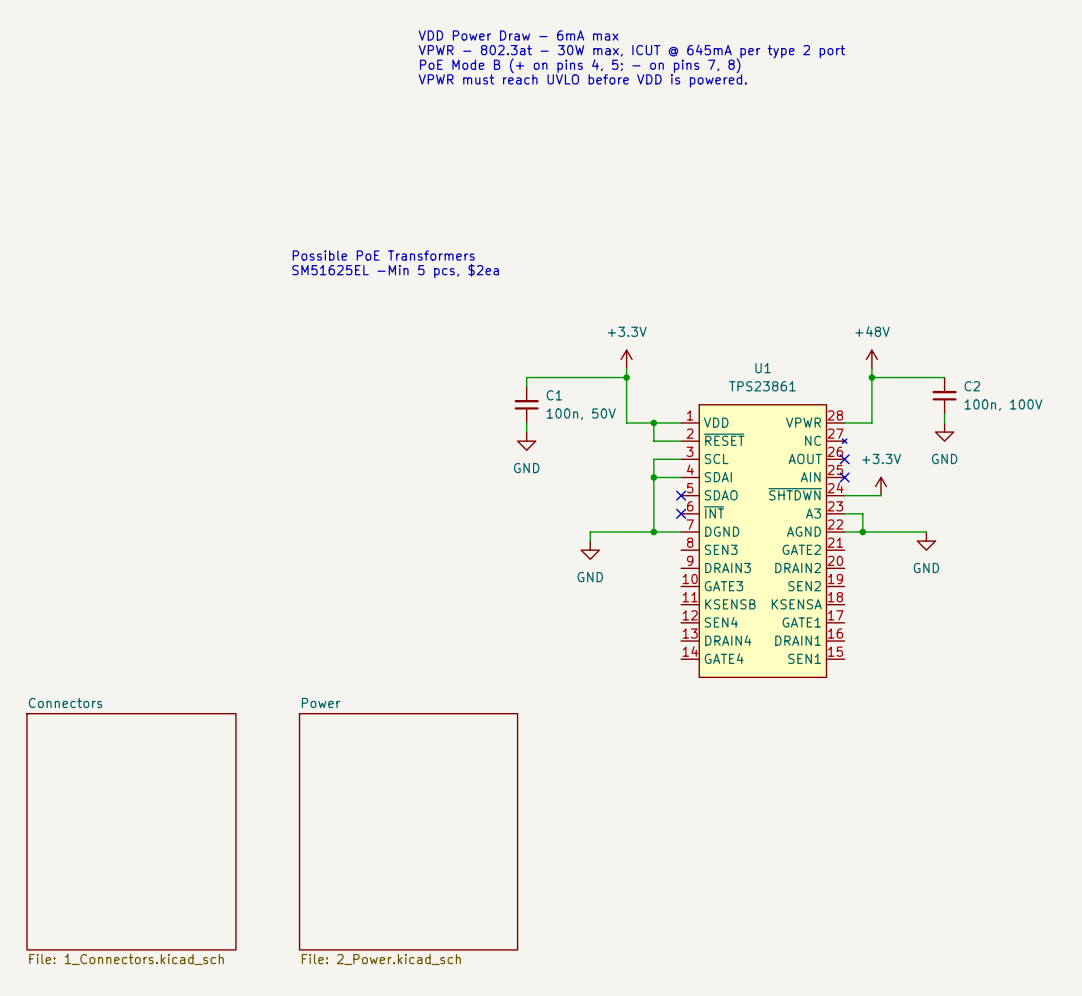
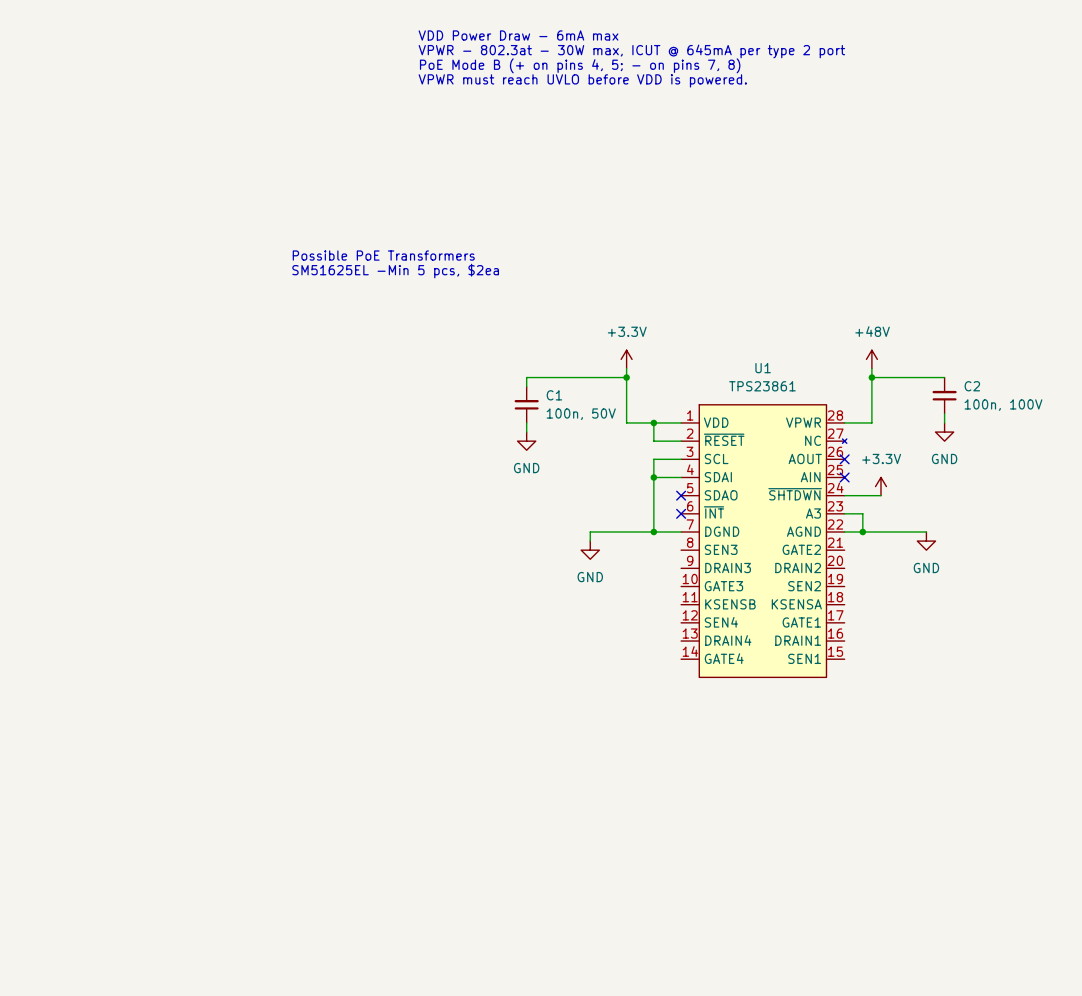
sheet Connectors: File: 1_Connectors.kicad_sch (131, 831) -> none
sheet Power: File: 2_Power.kicad_sch (408, 831) -> none

